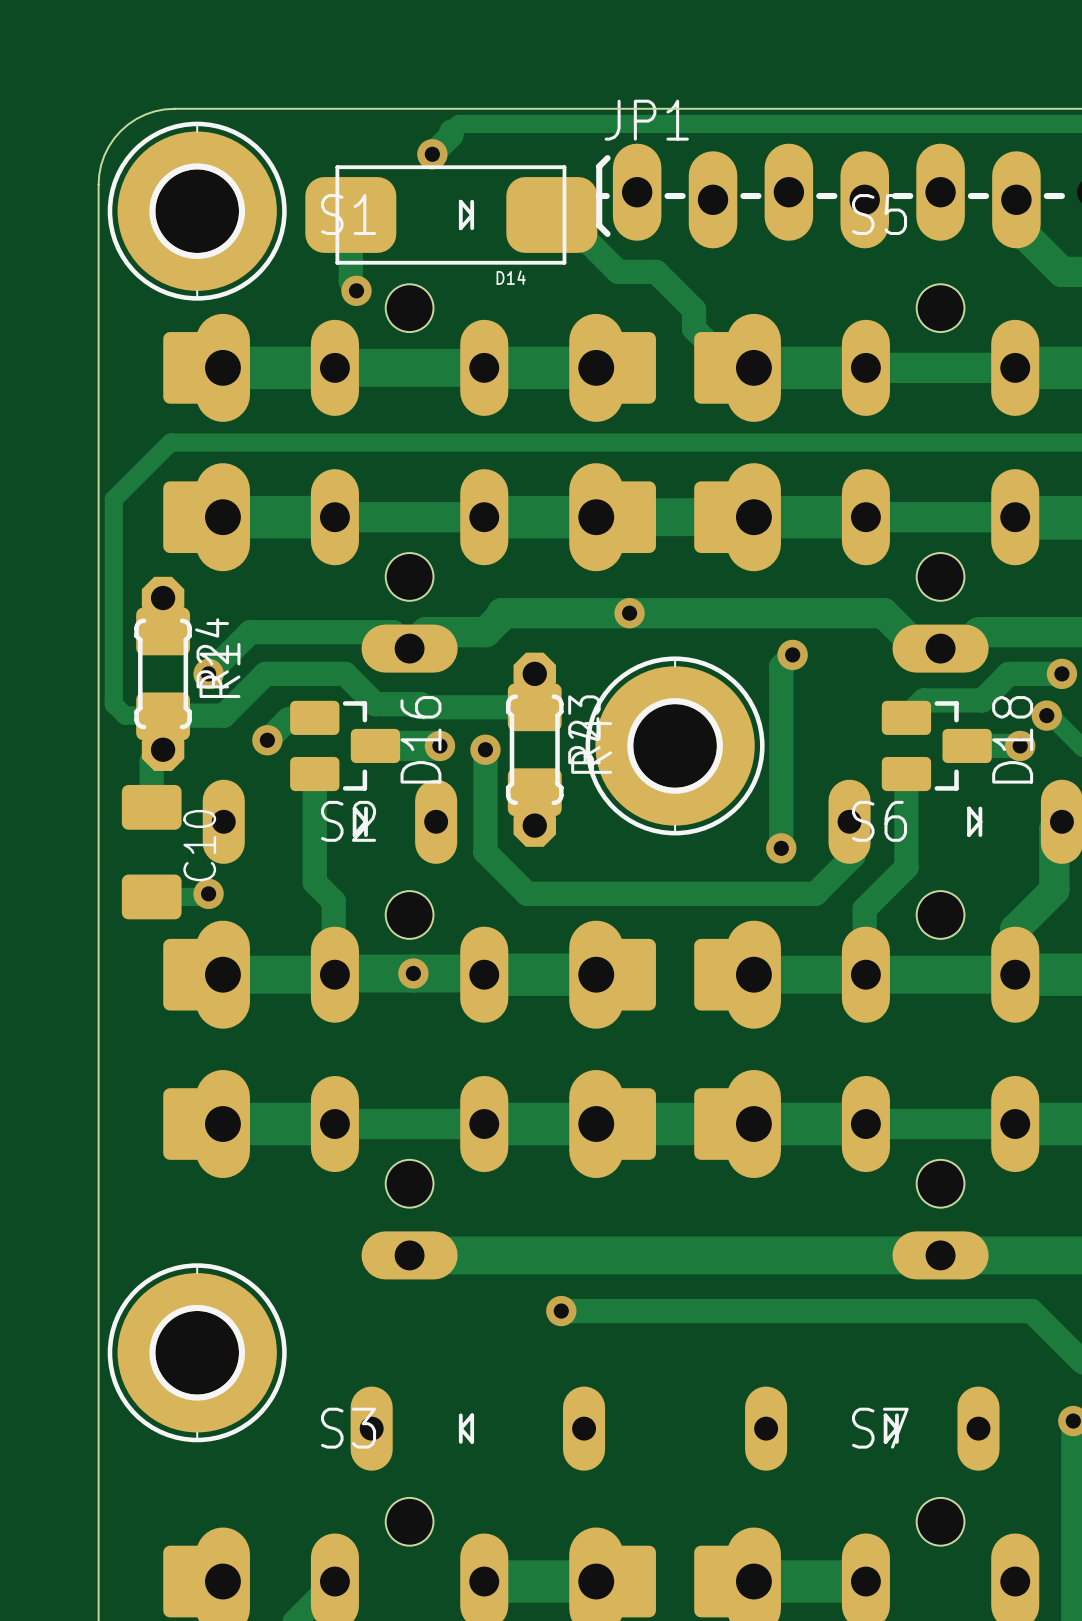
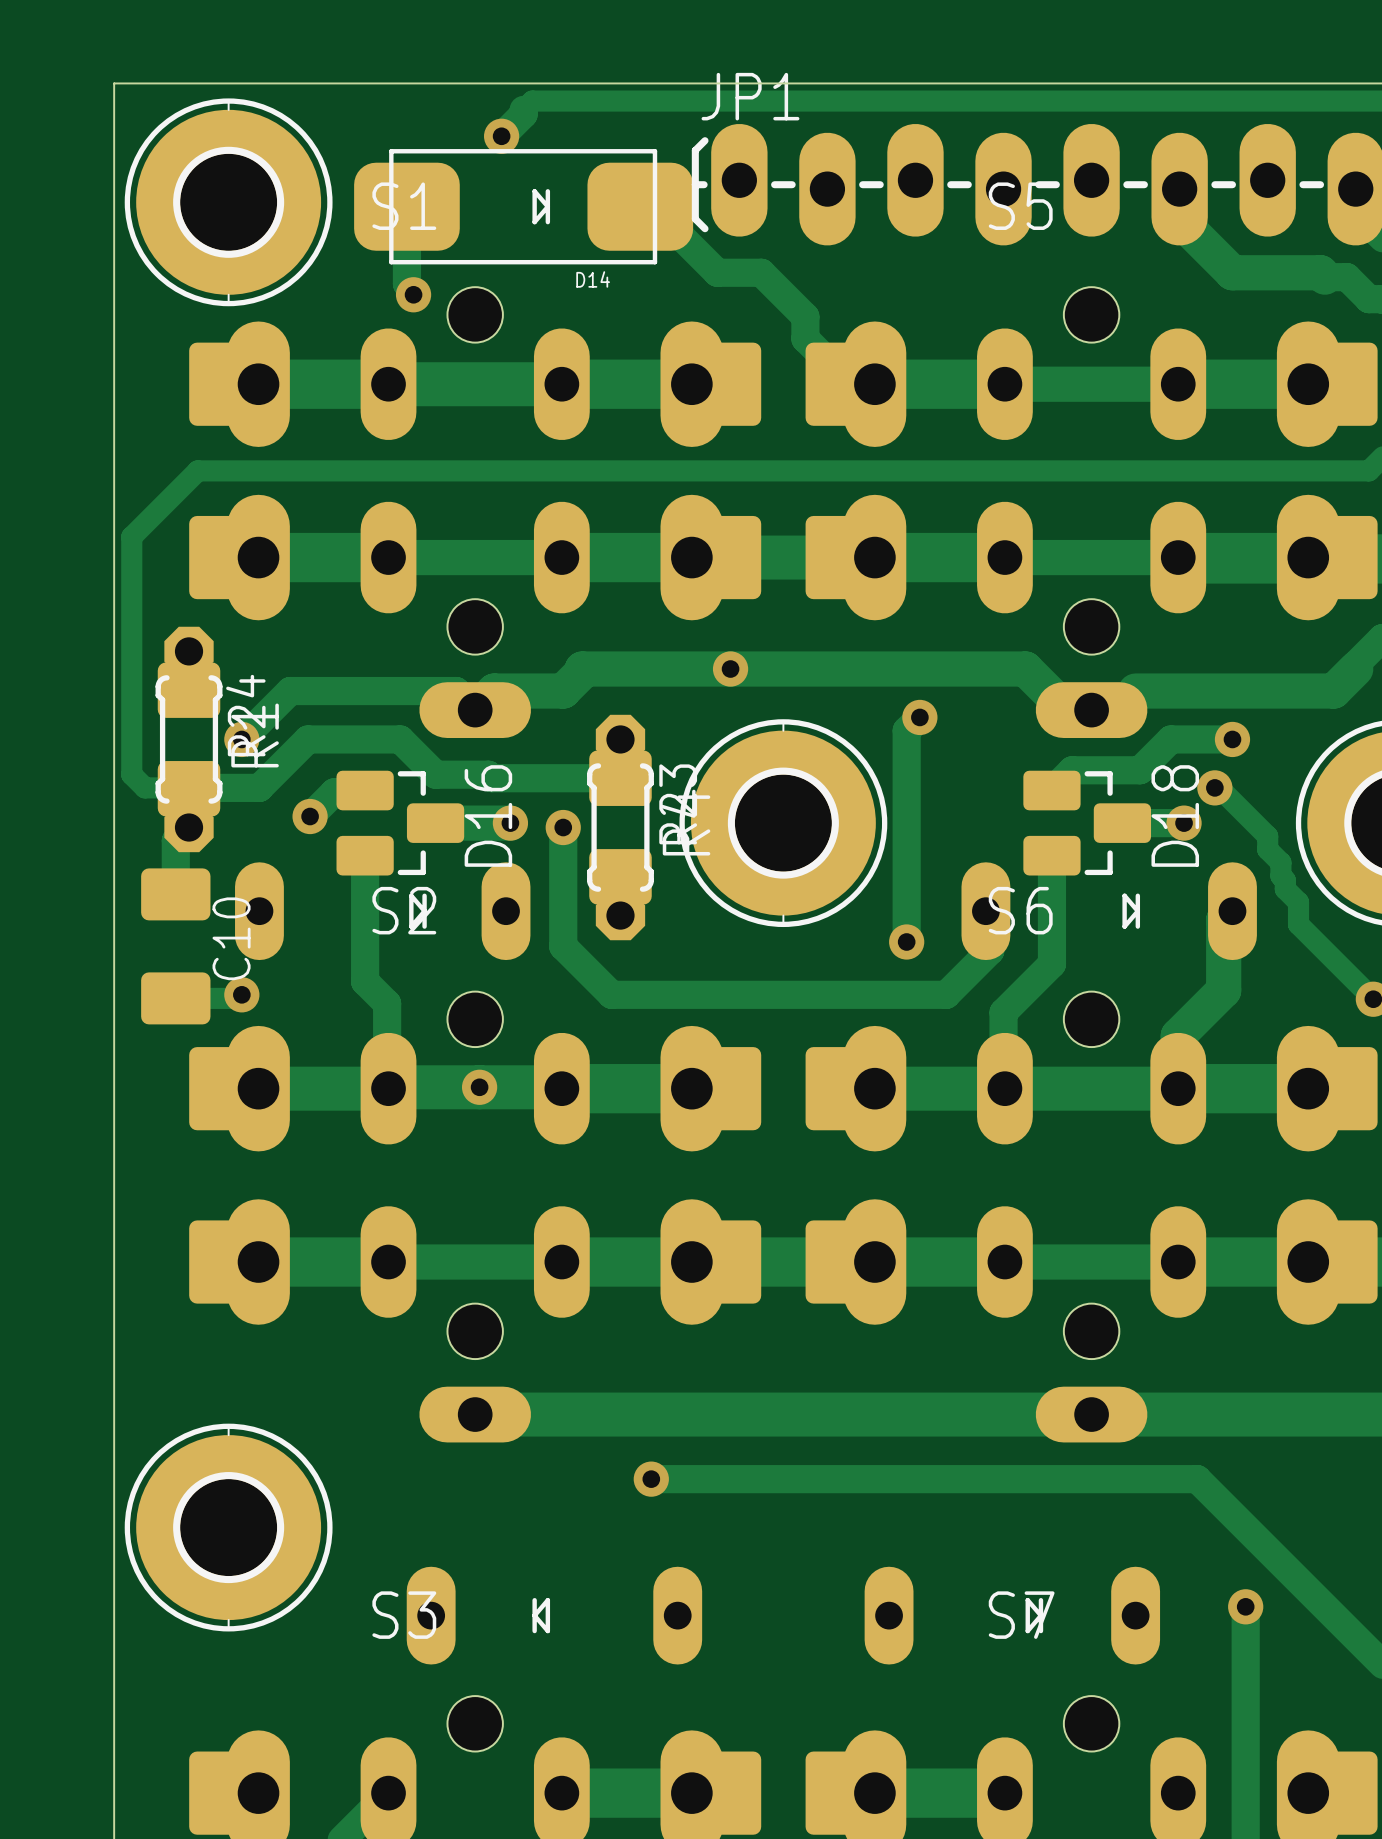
board edge: (174, 108) (145, 114) (120, 131) (104, 155) (98, 184) -> (202, 83) (114, 83) (114, 171)

